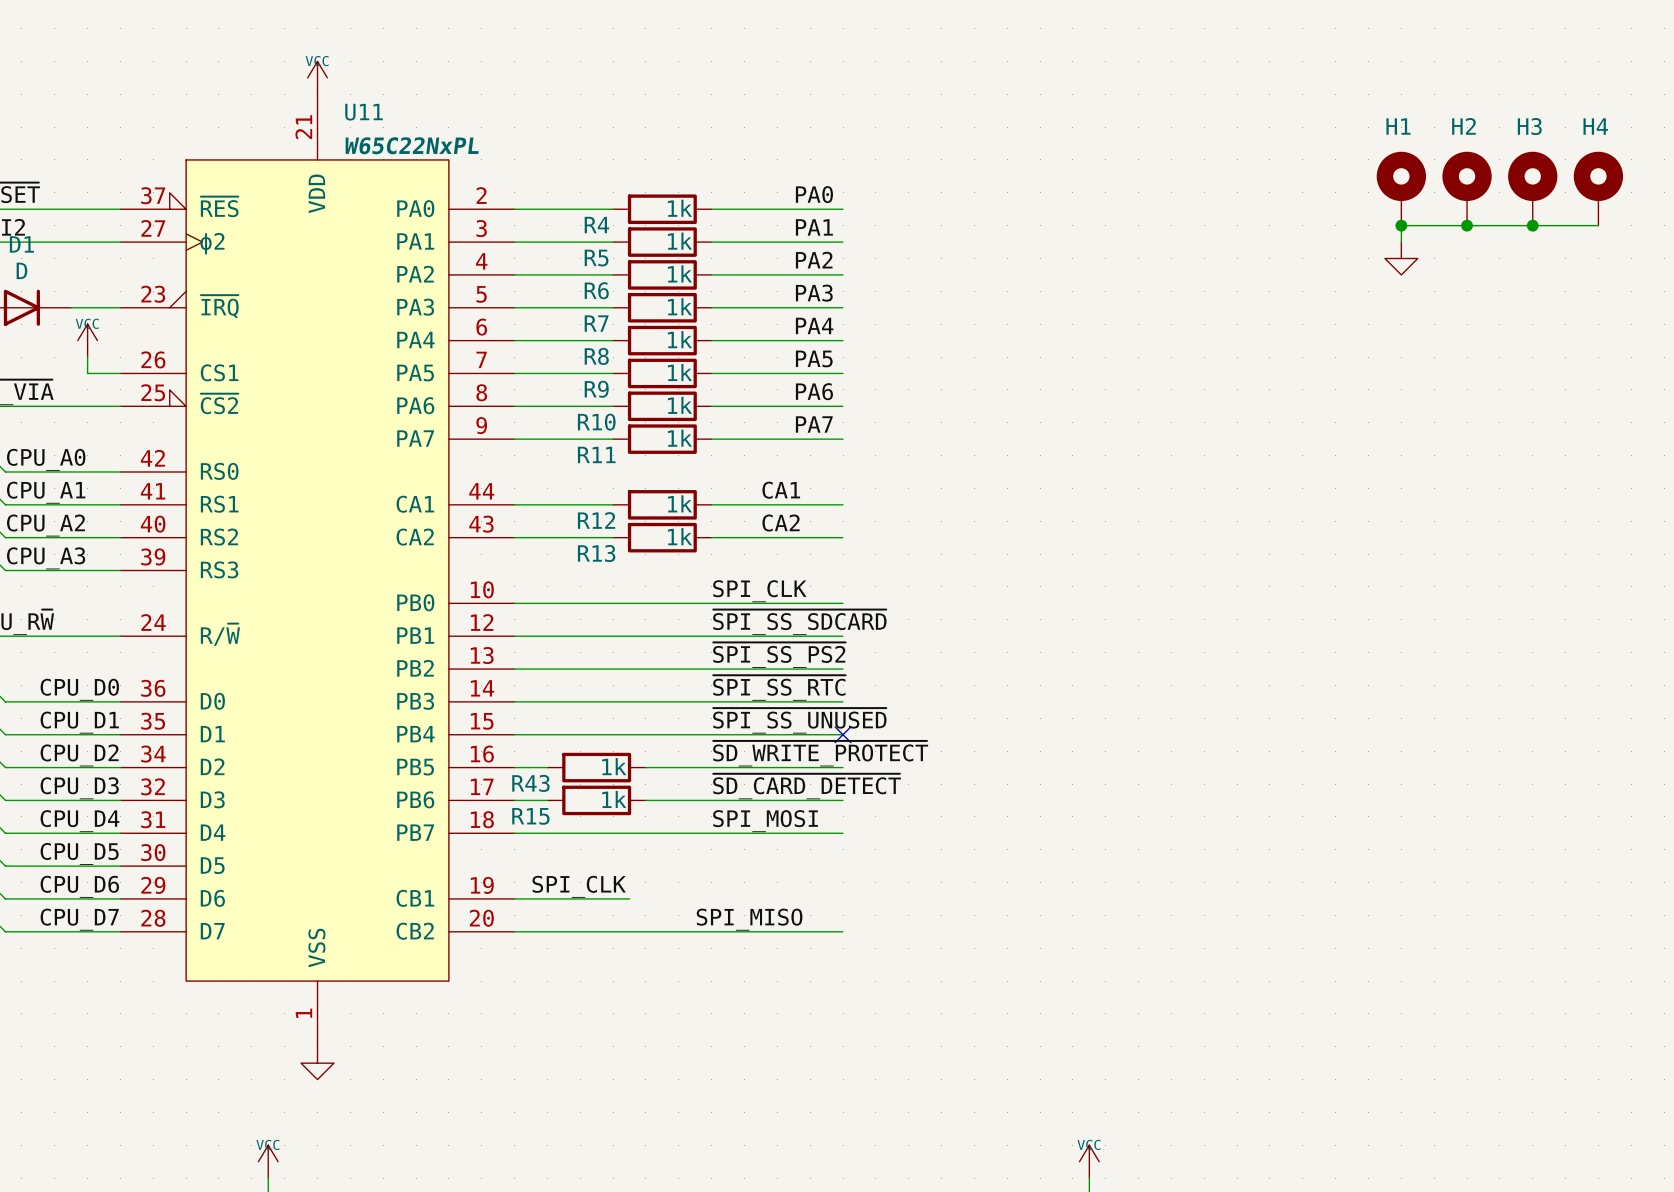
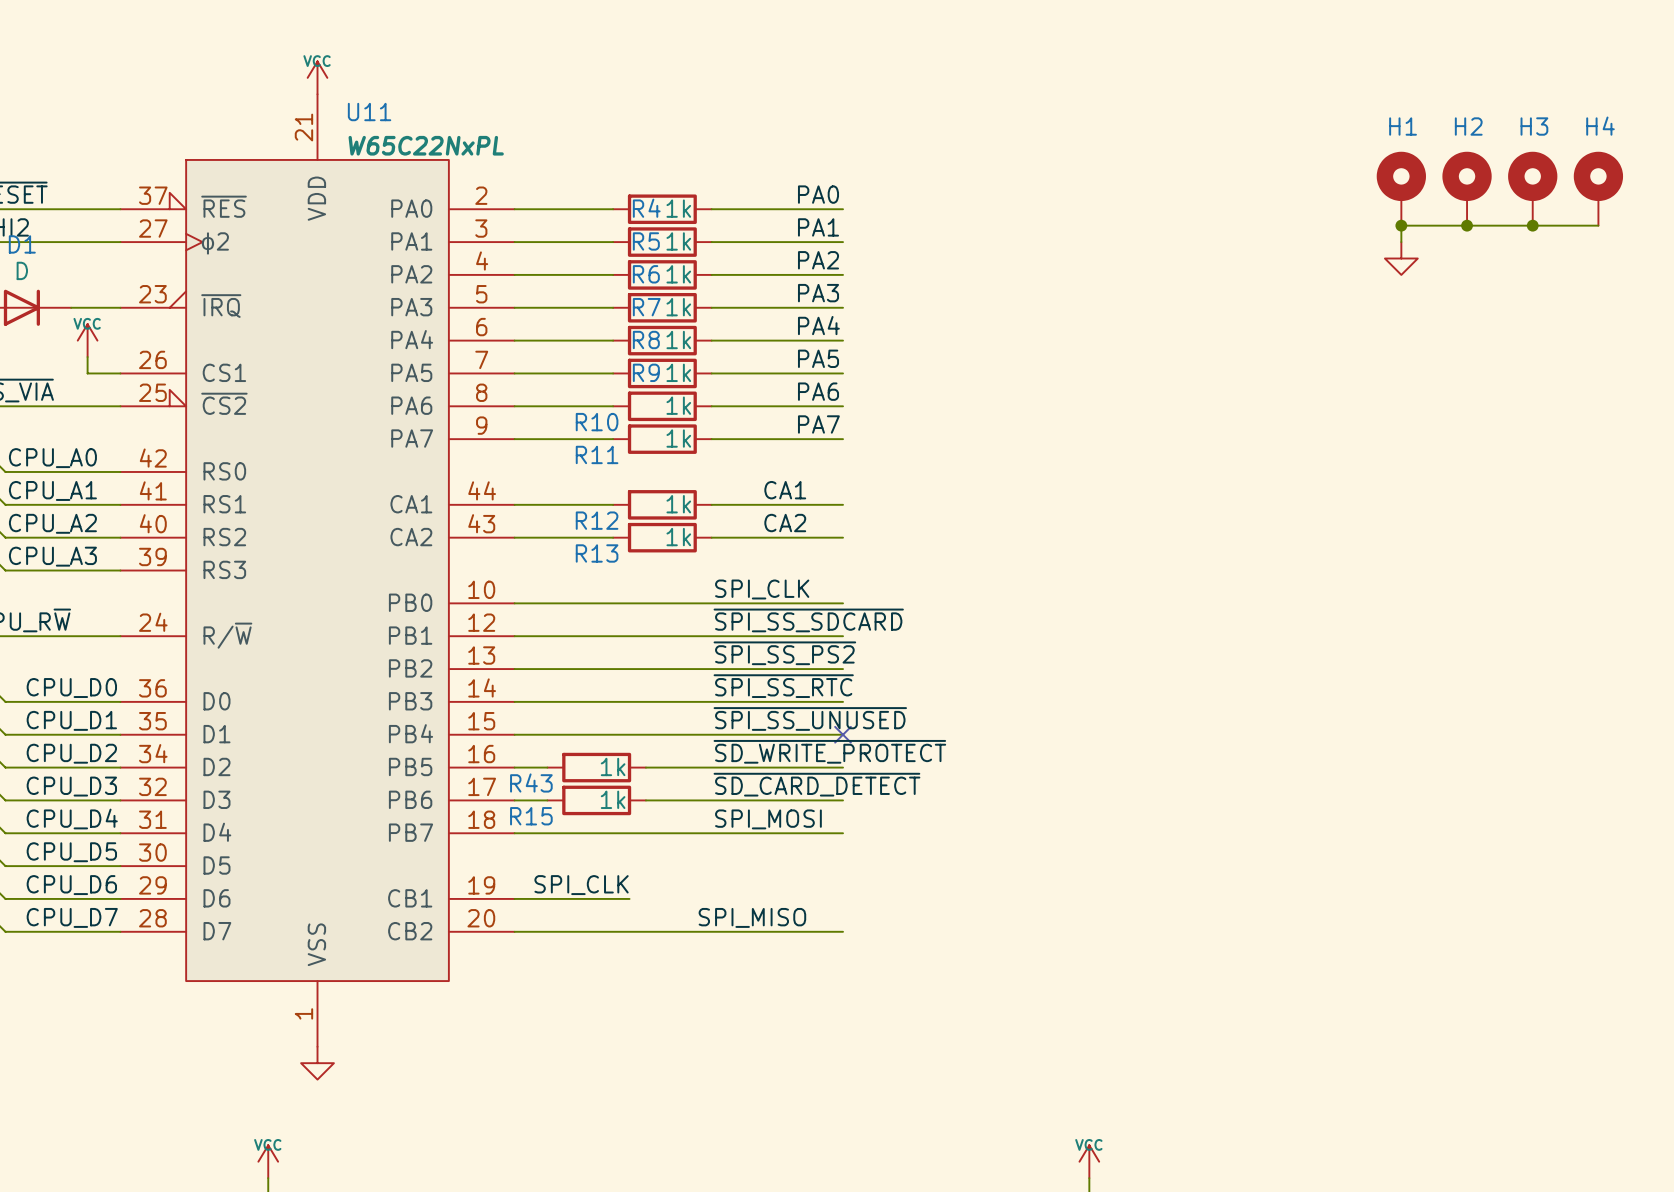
R4 name position: R4 (596, 225) -> R4 (646, 208)
R5 name position: R5 (596, 258) -> R5 (646, 241)
R6 name position: R6 (596, 290) -> R6 (646, 274)
R7 name position: R7 (596, 323) -> R7 (646, 307)
R8 name position: R8 (596, 356) -> R8 (646, 340)
R9 name position: R9 (596, 389) -> R9 (646, 372)

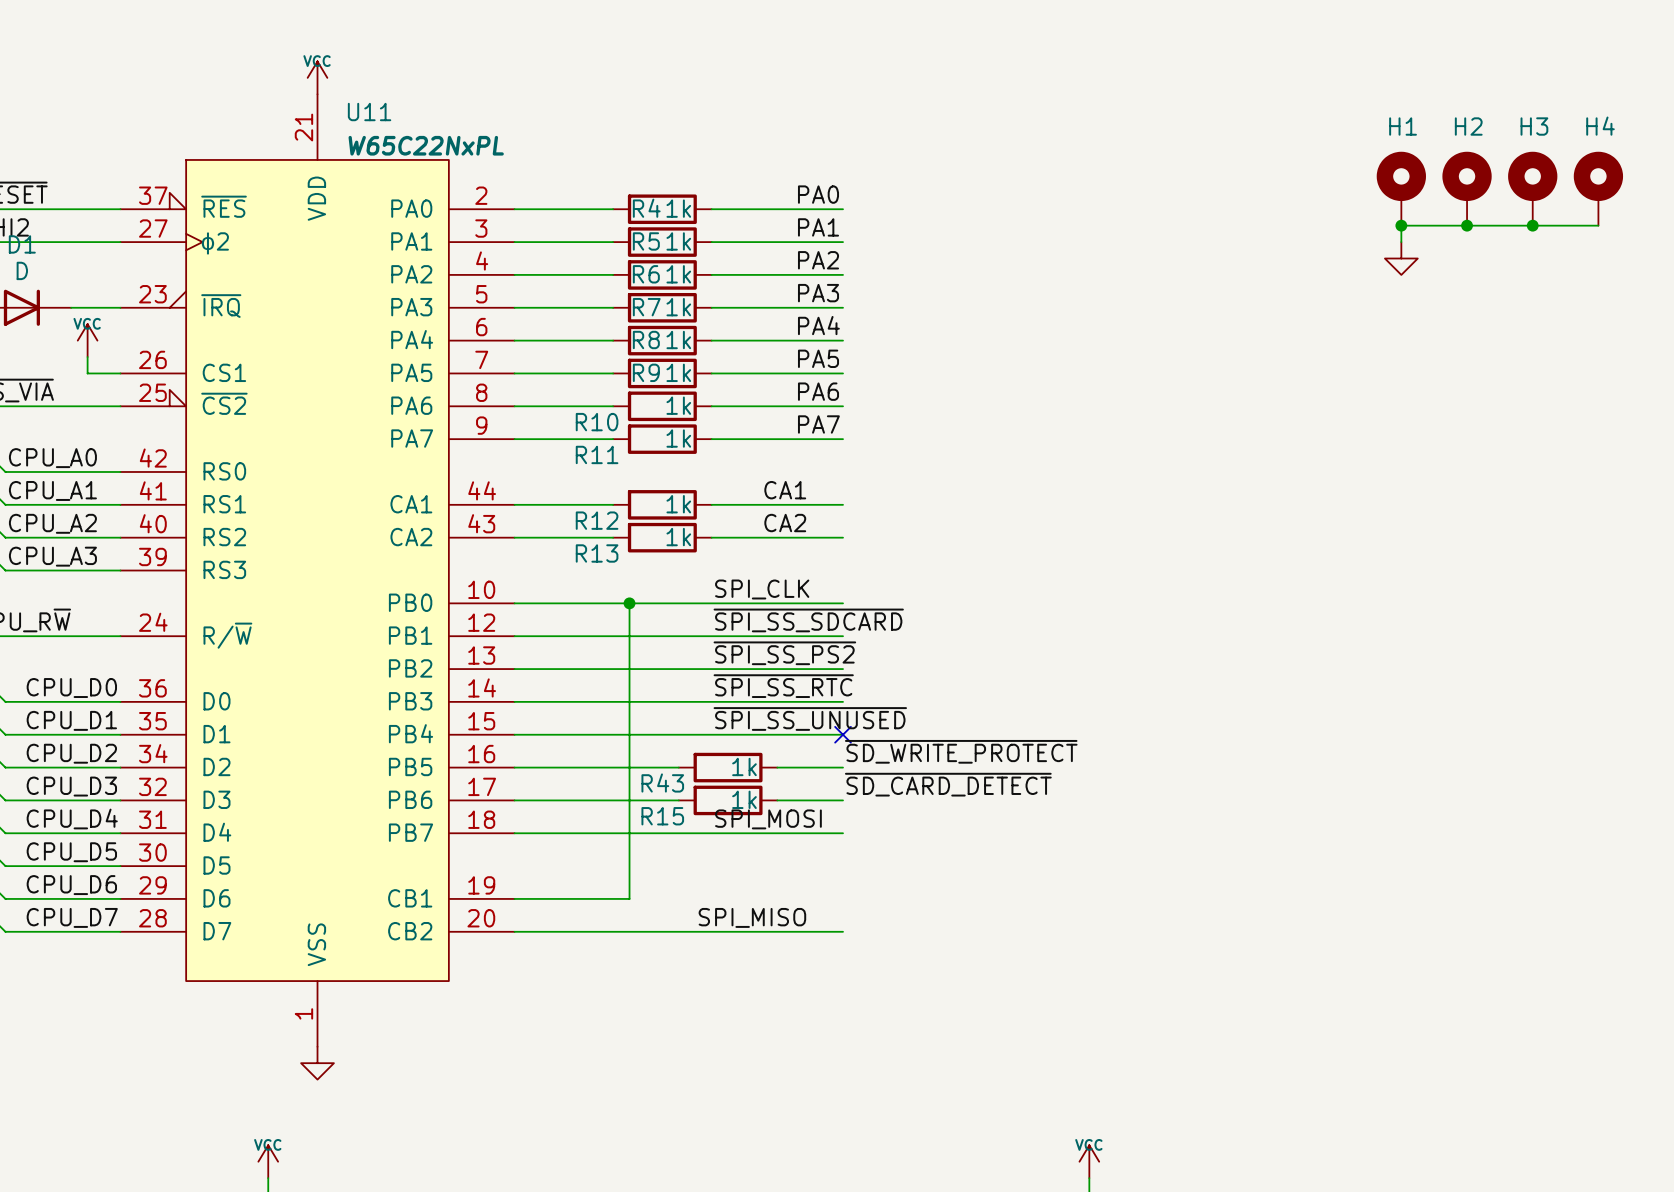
wire: none -> (629, 603) (629, 898)
junction: none -> (629, 603)
label position: ~{SD_WRITE_PROTECT} (829, 751) -> ~{SD_WRITE_PROTECT} (961, 751)
R43 position: (596, 767) -> (728, 767)
wire: (678, 767) (777, 767) -> (547, 767) (645, 767)
label position: ~{SD_CARD_DETECT} (816, 784) -> ~{SD_CARD_DETECT} (948, 784)
R15 position: (596, 800) -> (728, 800)
wire: (678, 800) (777, 800) -> (547, 800) (645, 800)
label: SPI_CLK (581, 885) -> none

